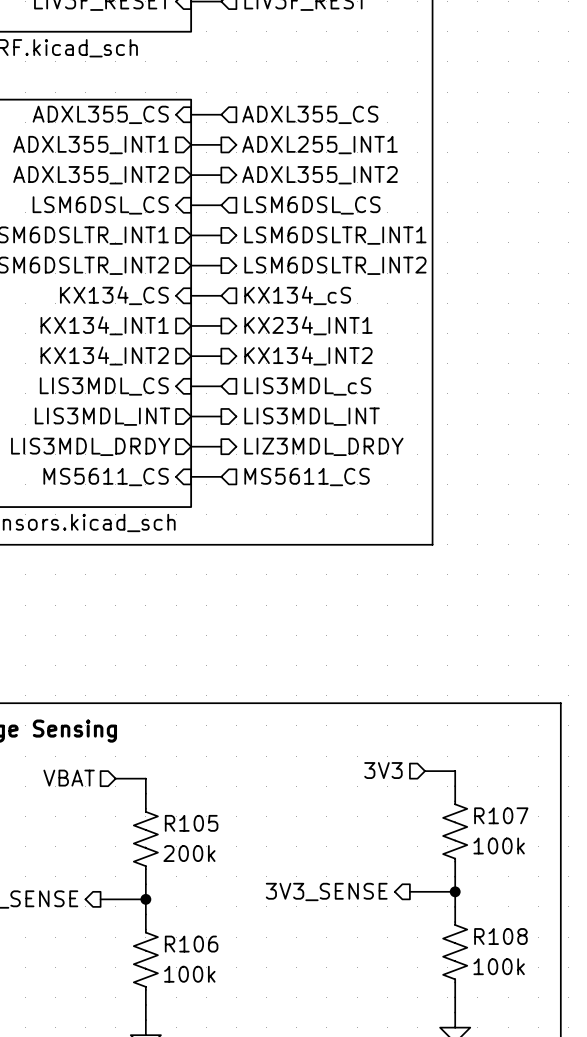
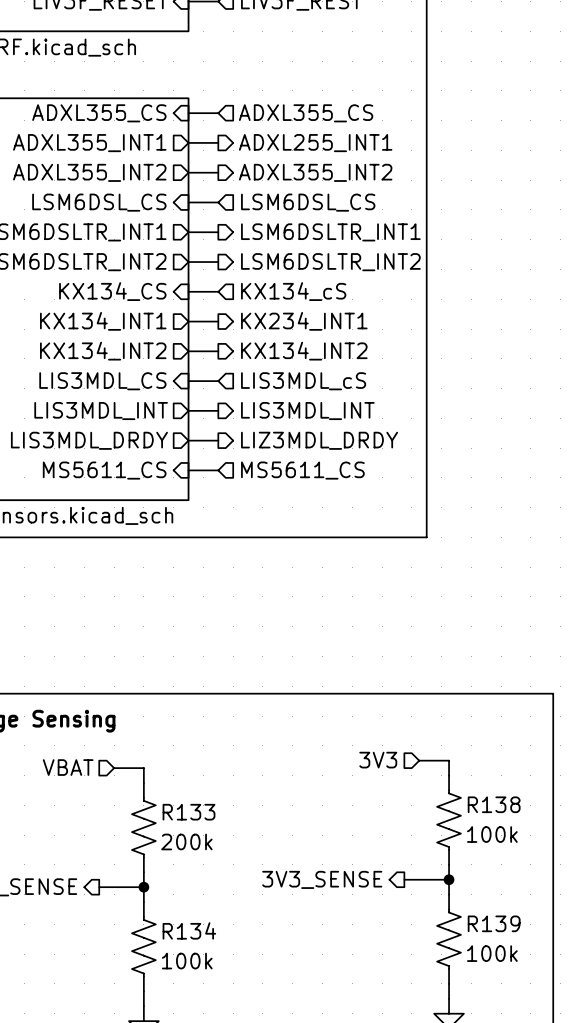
R107 name: R107 (501, 815) -> R138 (494, 804)
R105 name: R105 (191, 823) -> R133 (189, 812)
R108 name: R108 (500, 936) -> R139 (494, 923)
R106 name: R106 (191, 944) -> R134 (189, 930)

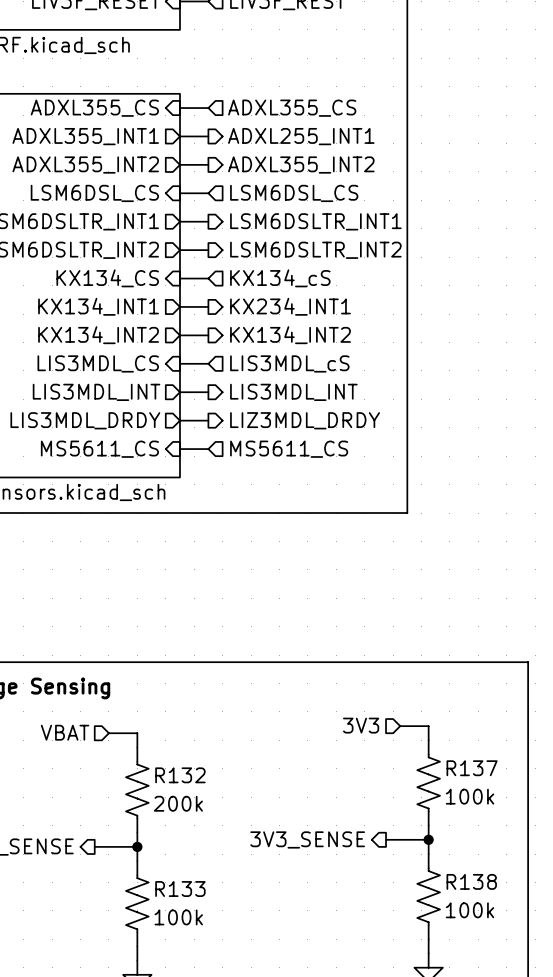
R138 name: R138 (494, 804) -> R137 (472, 768)
R133 name: R133 (189, 812) -> R132 (180, 775)
R139 name: R139 (494, 923) -> R138 (471, 881)
R134 name: R134 (189, 930) -> R133 (180, 889)

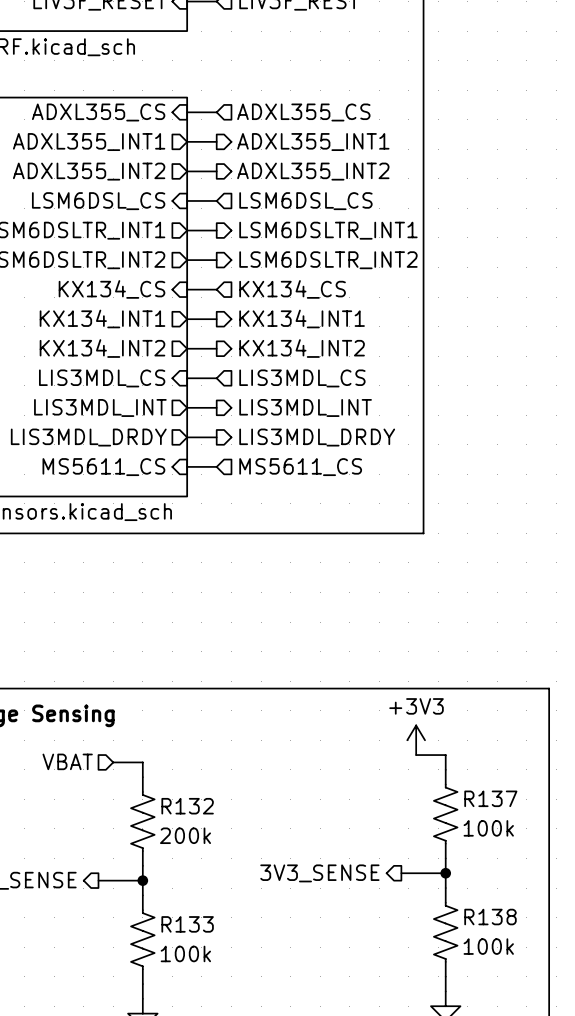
hierarchical label: ADXL255_INT1 (301, 136) -> ADXL355_INT1 (313, 142)
hierarchical label: KX134_cS (280, 278) -> KX134_CS (292, 289)
hierarchical label: KX234_INT1 (290, 306) -> KX134_INT1 (302, 318)
hierarchical label: LIS3MDL_cS (289, 363) -> LIS3MDL_CS (302, 378)
hierarchical label: LIZ3MDL_DRDY (305, 420) -> LIS3MDL_DRDY (317, 437)
power symbol: none -> +3V3 (416, 740)
hierarchical label: 3V3 (361, 725) -> none

